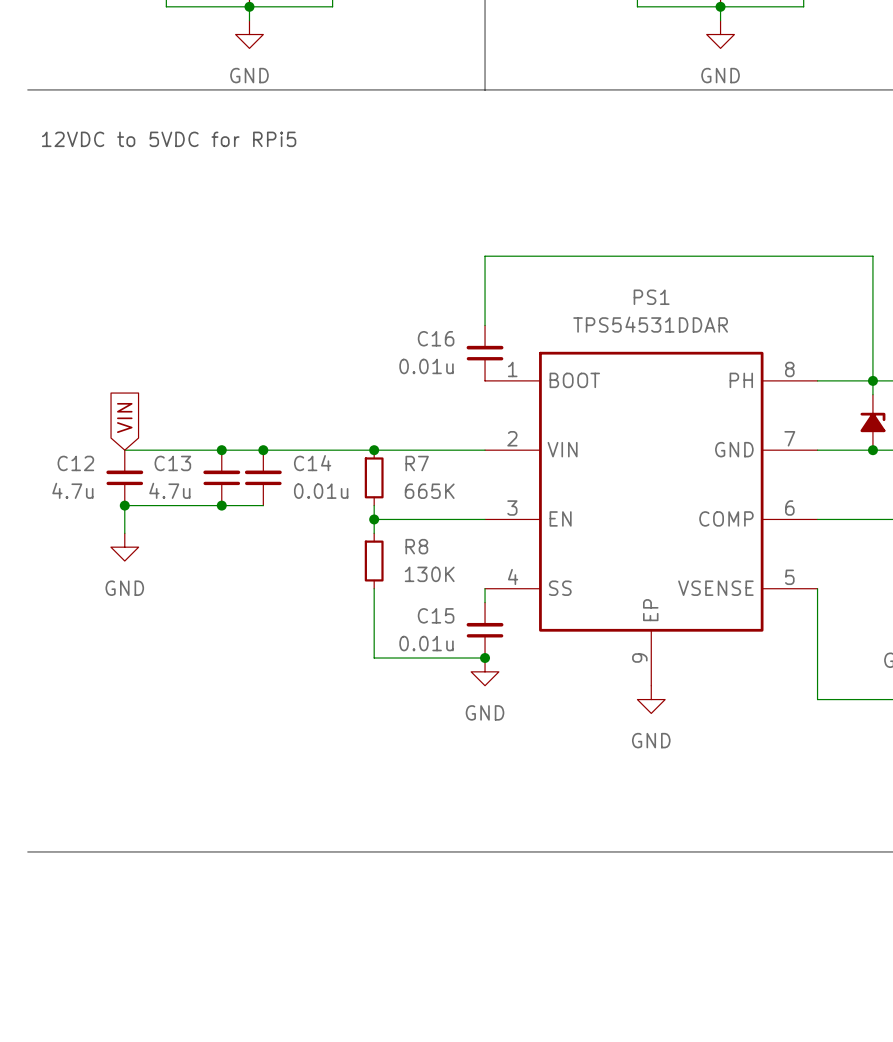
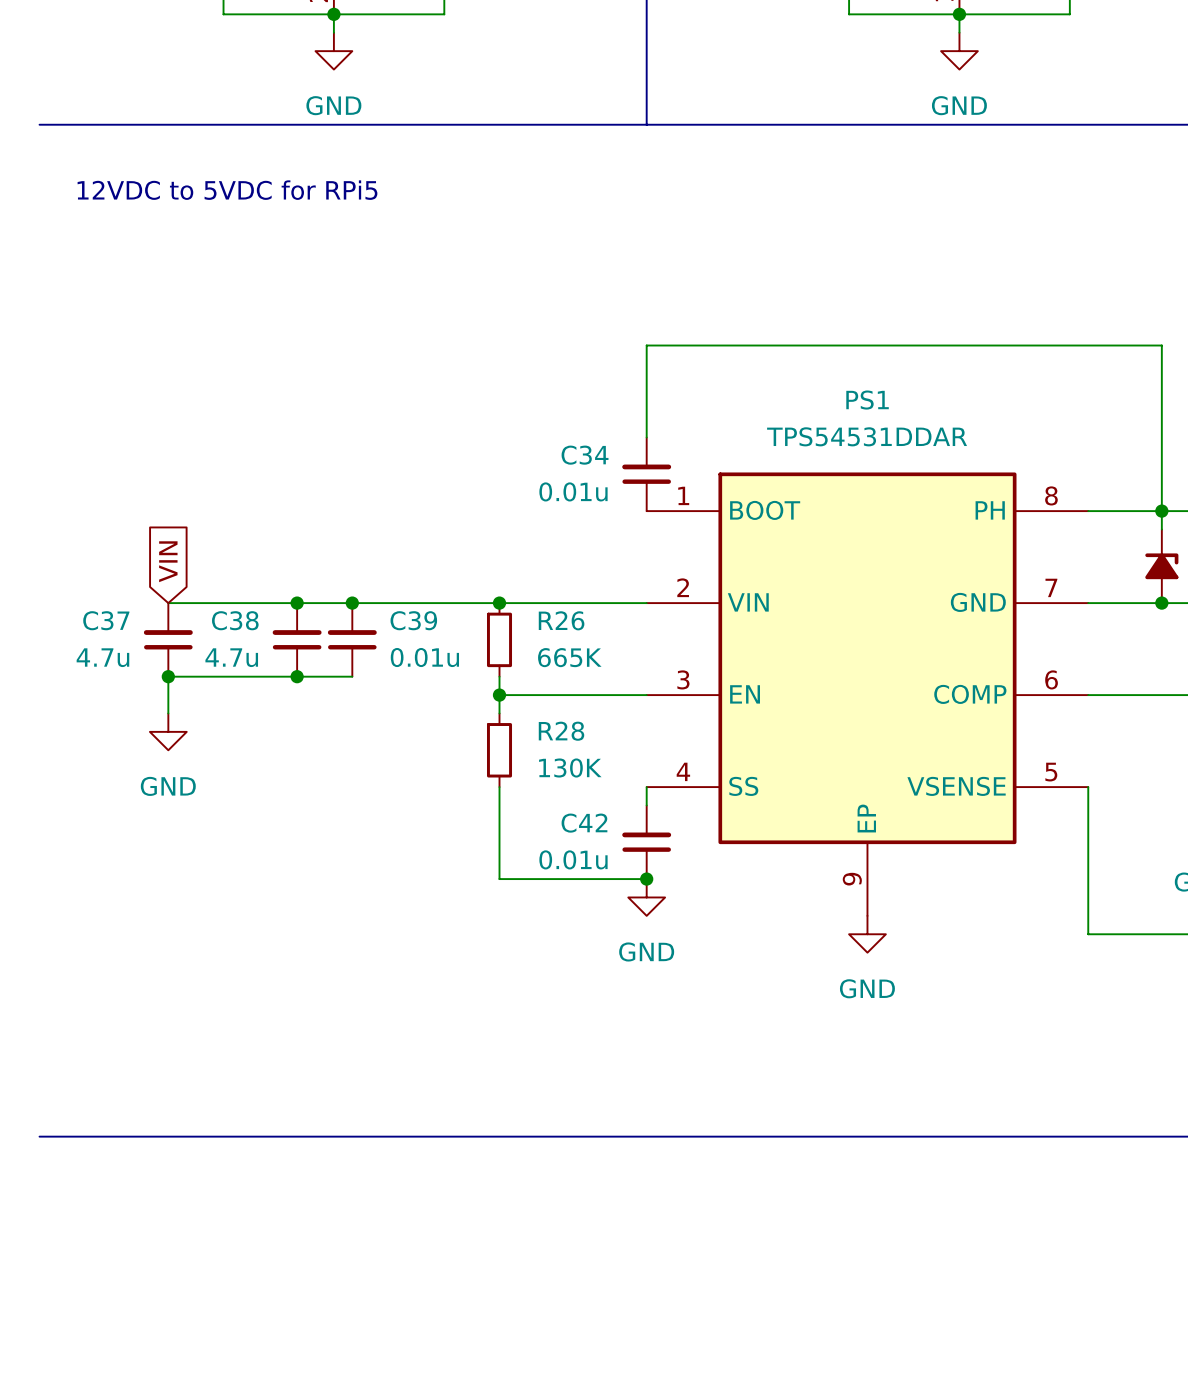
C16 name: C16 (436, 338) -> C34 (585, 455)
C12 name: C12 (75, 463) -> C37 (106, 620)
C13 name: C13 (172, 463) -> C38 (235, 620)
C14 name: C14 (312, 463) -> C39 (413, 620)
R7 name: R7 (417, 463) -> R26 (561, 620)
R8 name: R8 (416, 546) -> R28 (561, 731)
C15 name: C15 (436, 615) -> C42 (584, 823)

